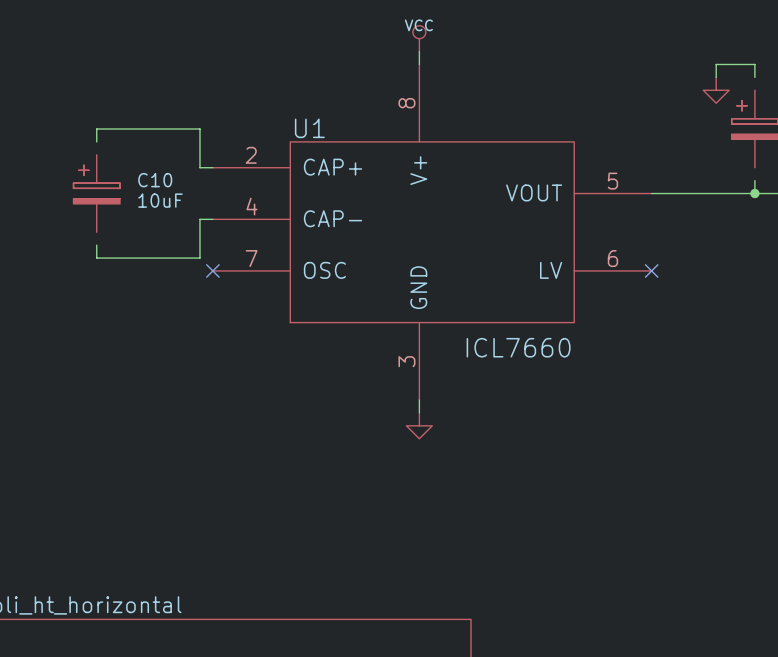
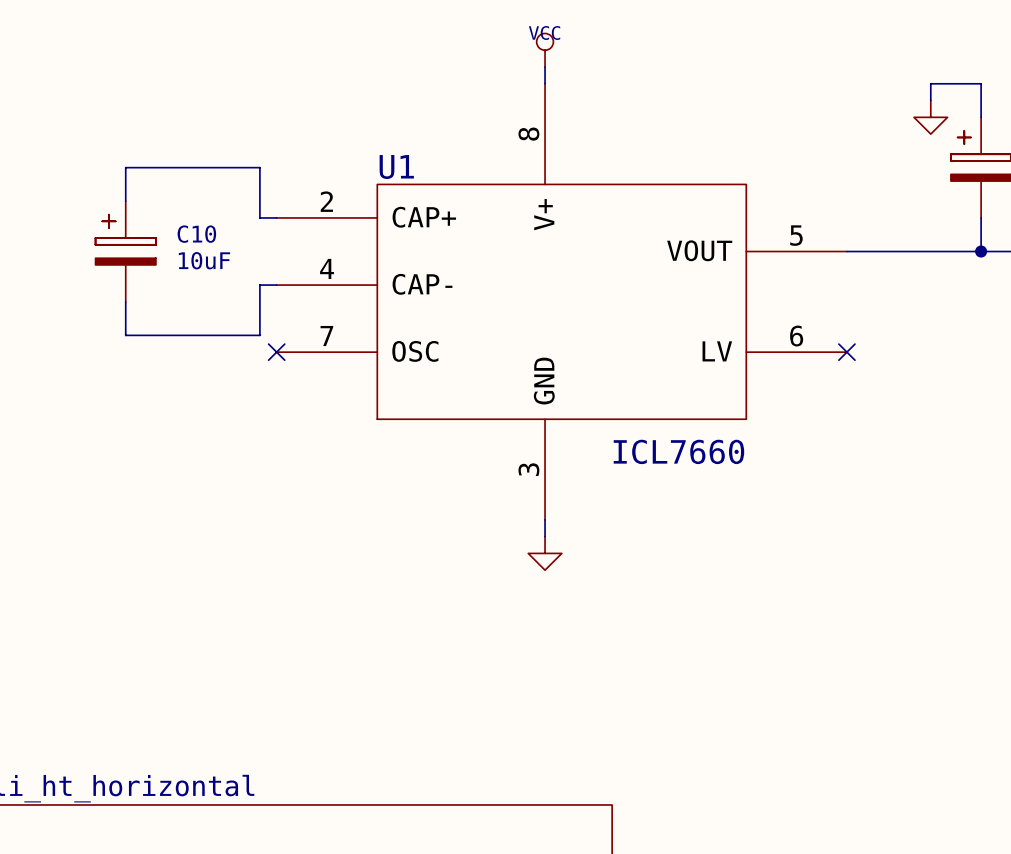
wire: none -> (981, 100) (981, 117)
wire: none -> (125, 184) (125, 201)
wire: none -> (981, 217) (981, 234)
wire: none -> (125, 301) (125, 318)

